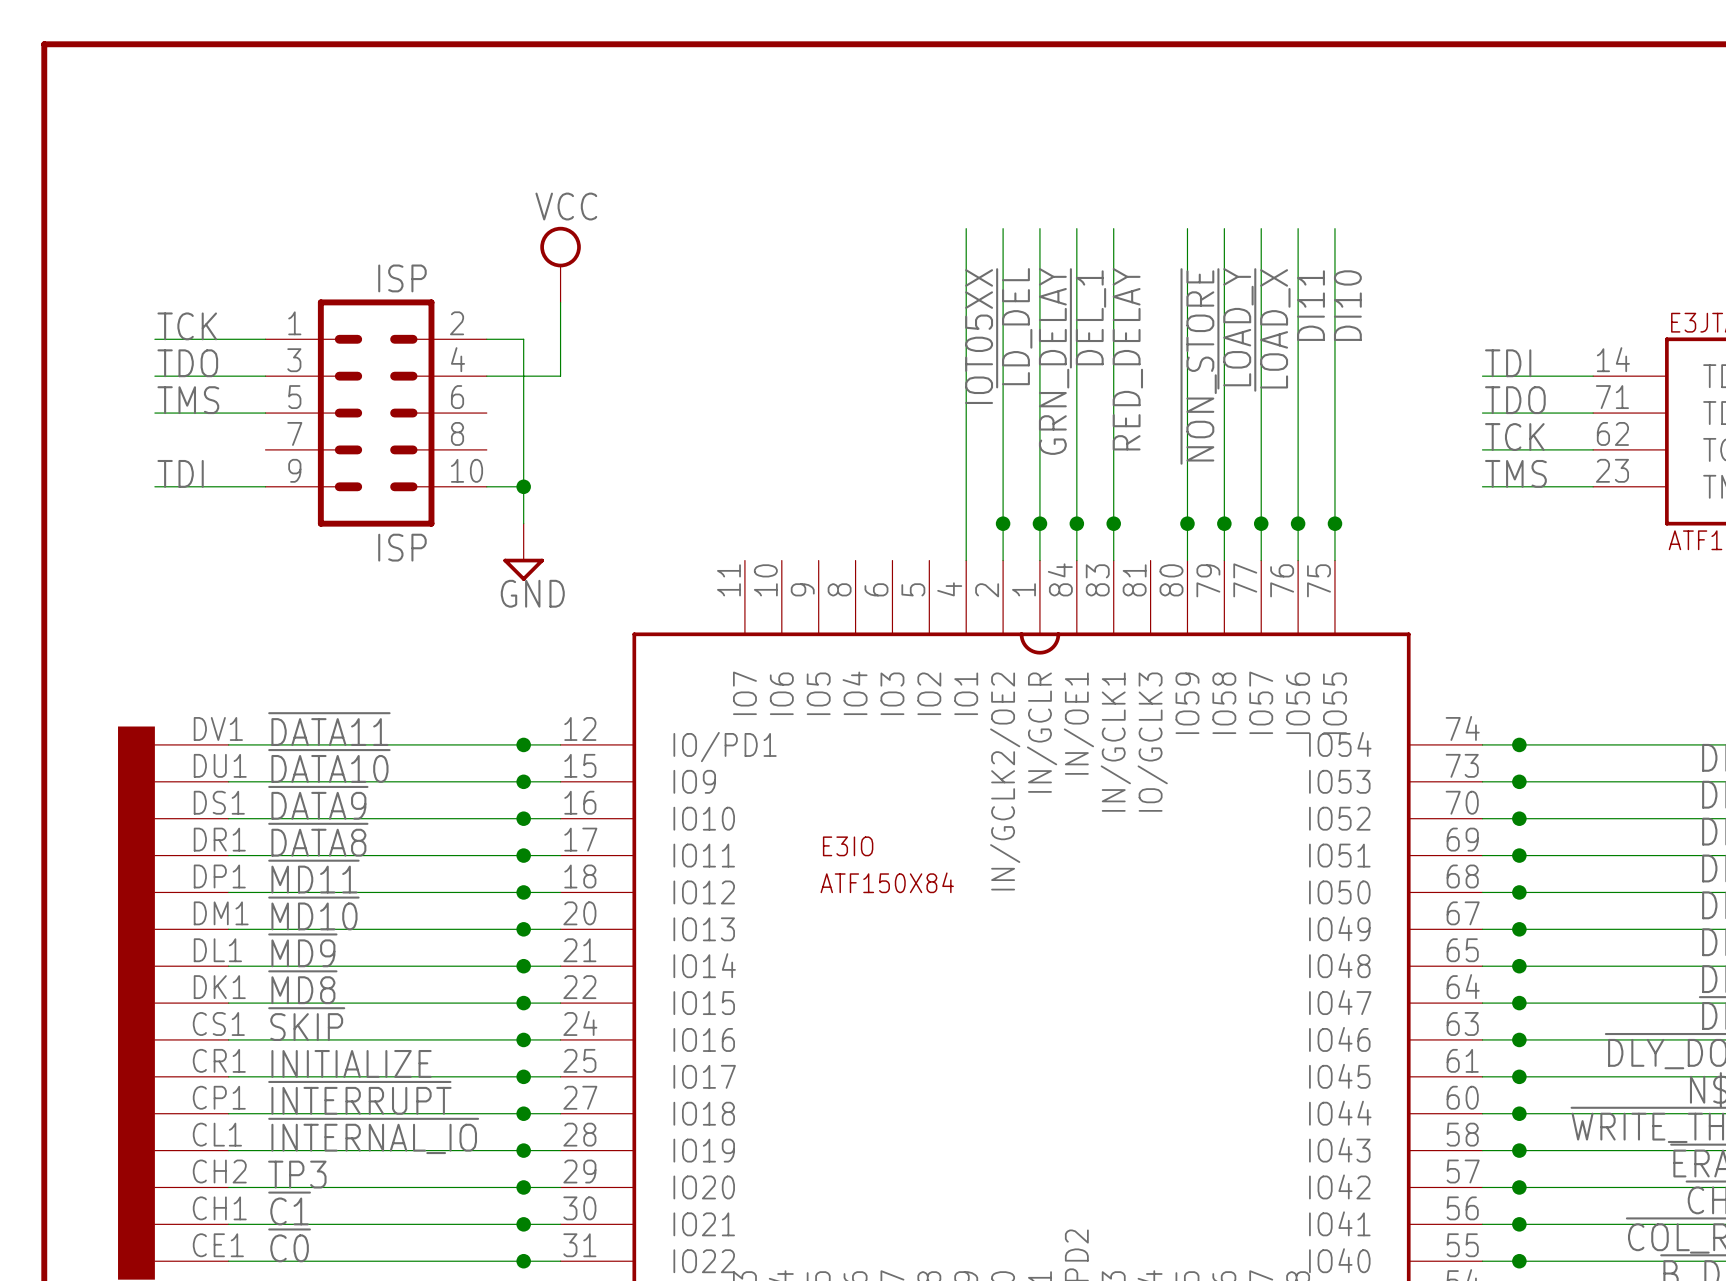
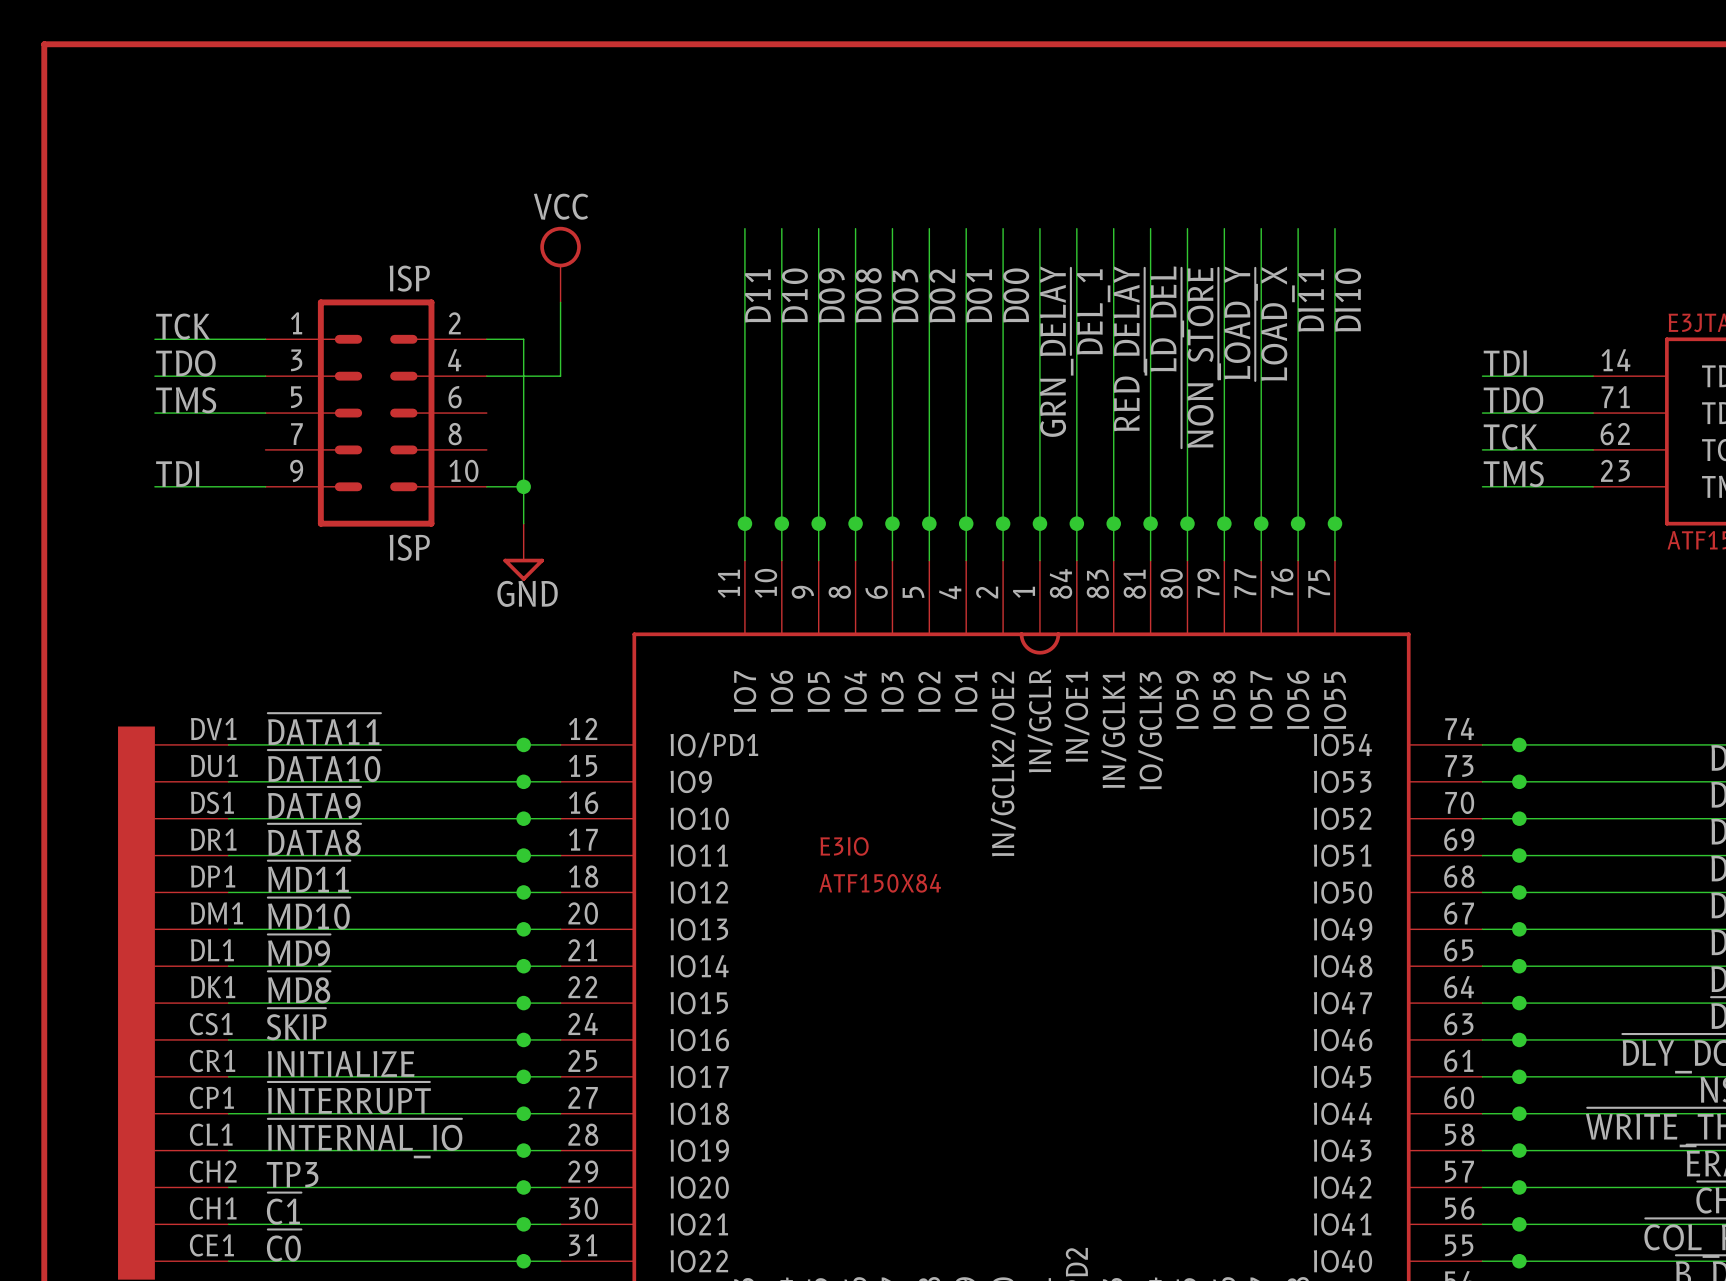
wire: none -> (744, 228) (744, 560)
wire: none -> (781, 228) (781, 560)
wire: none -> (818, 228) (818, 560)
wire: none -> (855, 228) (855, 560)
wire: none -> (892, 228) (892, 560)
wire: none -> (929, 228) (929, 560)
wire: none -> (1150, 228) (1150, 560)
label: none -> D11 (757, 295)
label: none -> D10 (794, 295)
label: none -> D09 (831, 295)
label: none -> D08 (868, 295)
label: none -> D03 (905, 295)
label: none -> D02 (942, 295)
label: ~{LD_DEL} (1014, 328) -> D00 (1016, 295)
label: none -> ~{LD_DEL} (1164, 319)
label: IOT05XX (979, 336) -> D01 (979, 295)
junction: none -> (744, 523)
junction: none -> (781, 523)
junction: none -> (818, 523)
junction: none -> (855, 523)
junction: none -> (892, 523)
junction: none -> (929, 523)
junction: none -> (966, 523)
junction: none -> (1150, 523)

